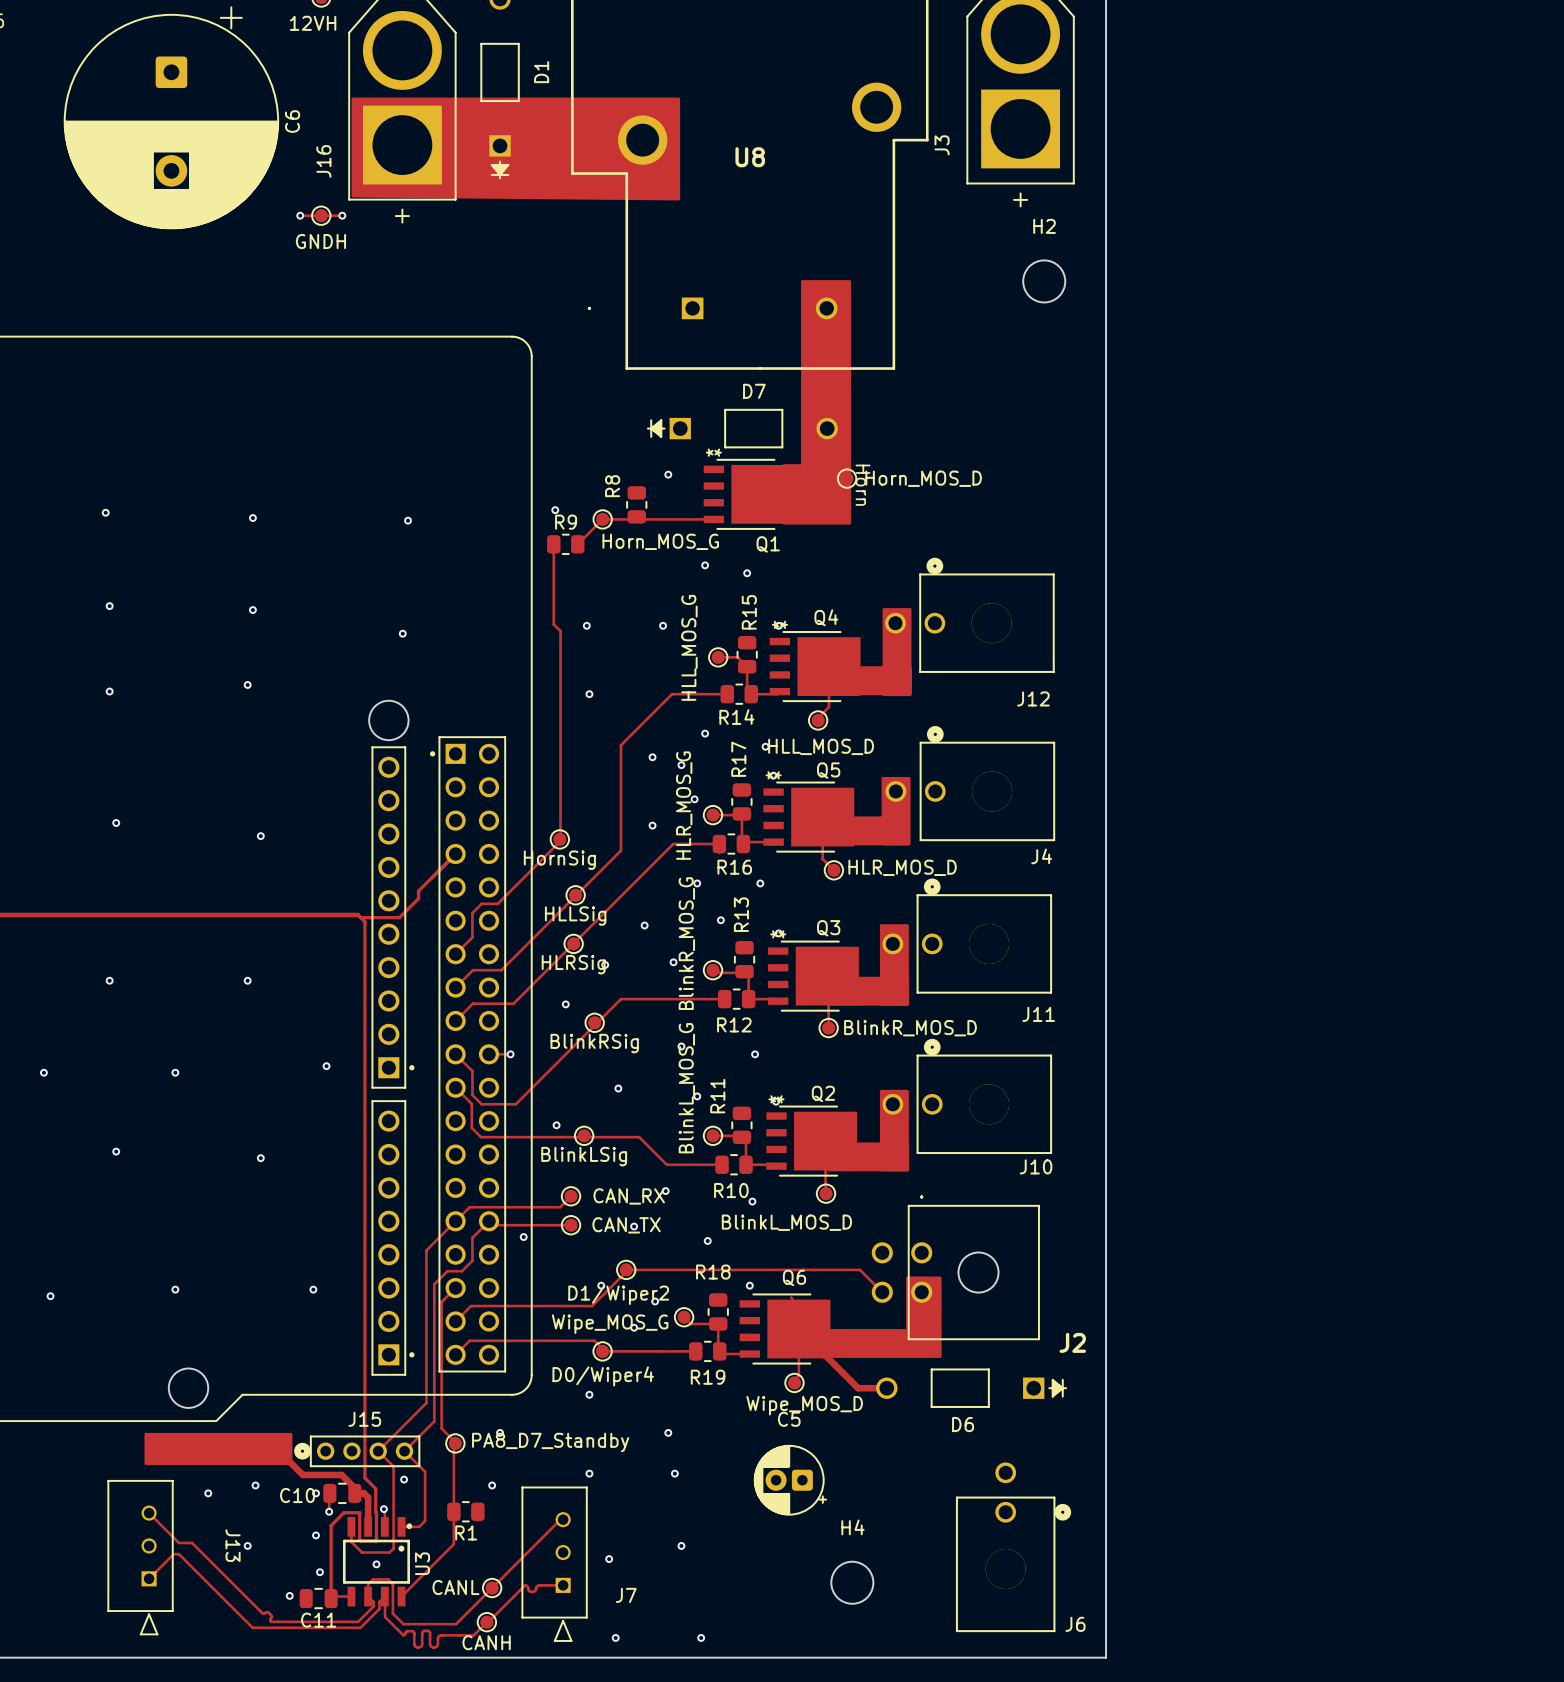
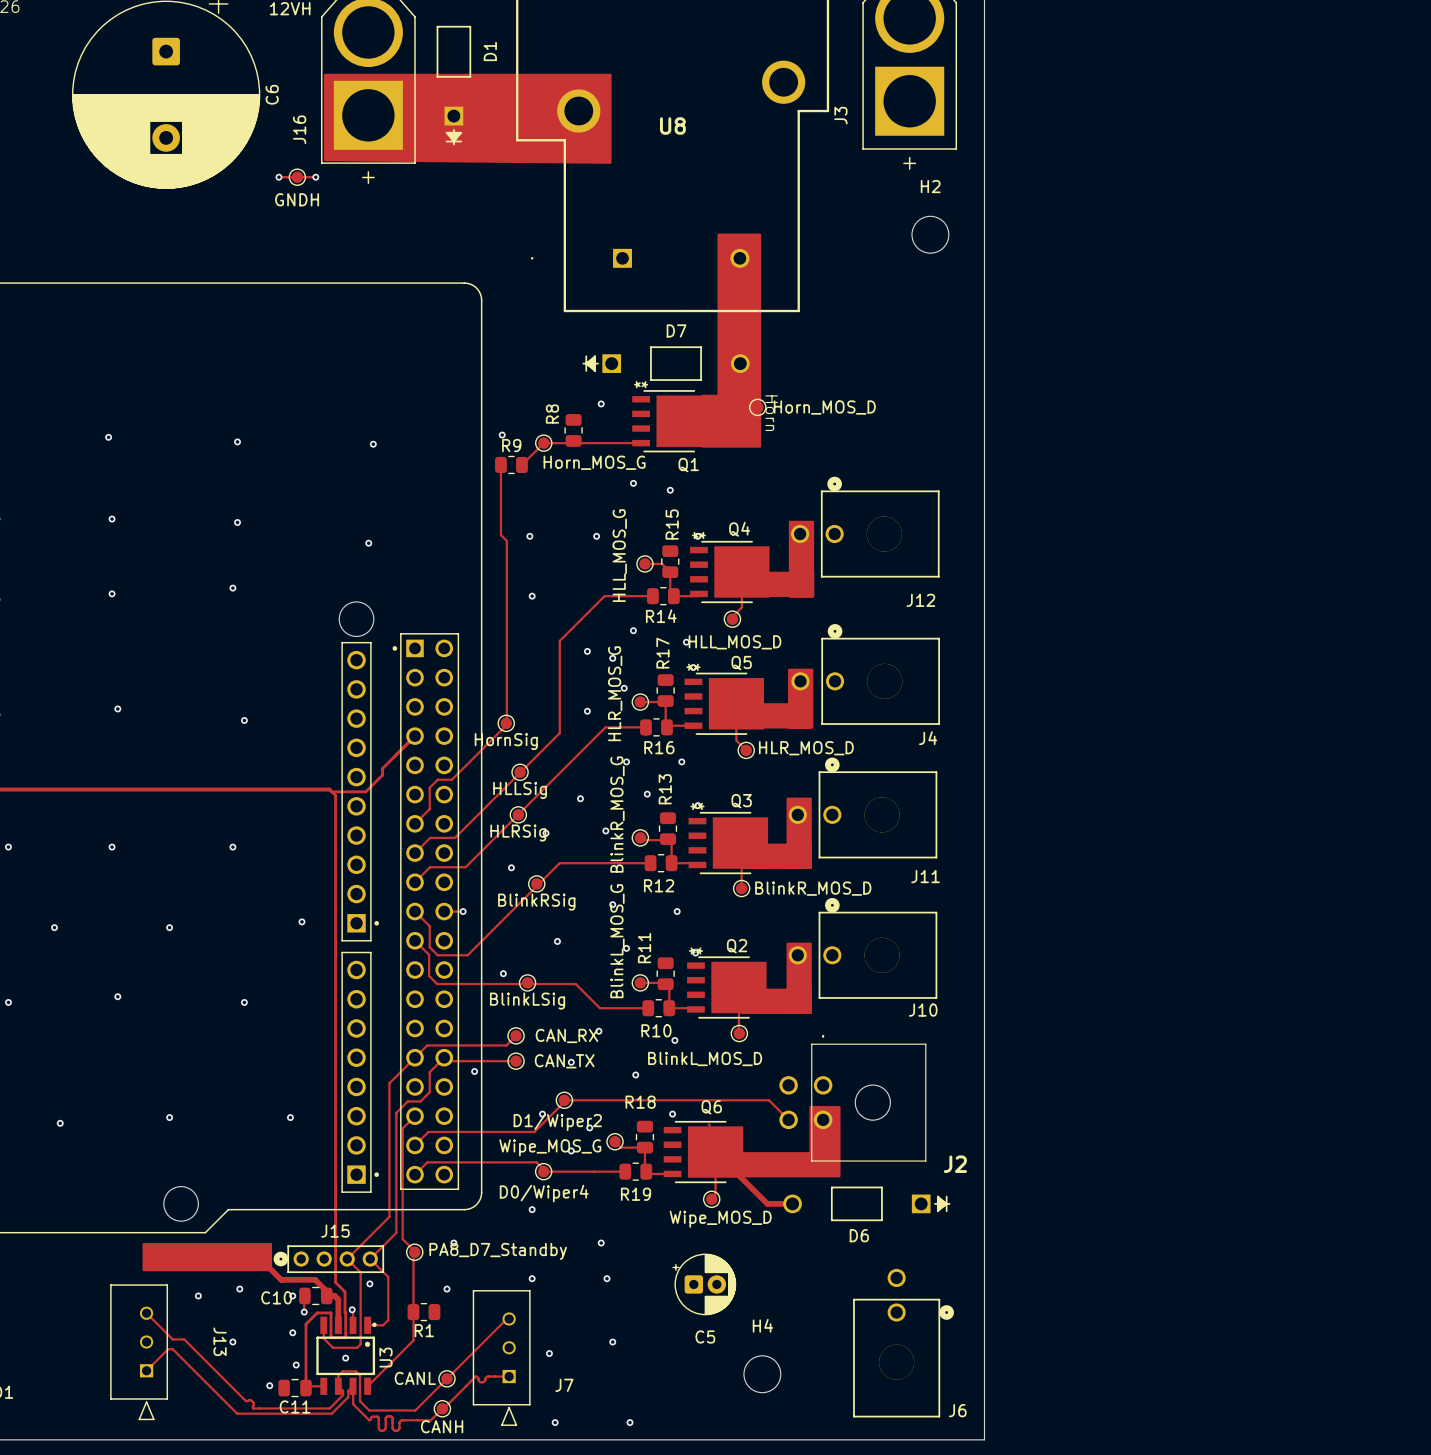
C5 rotation: 0° (790, 1480) -> 180° (704, 1284)

